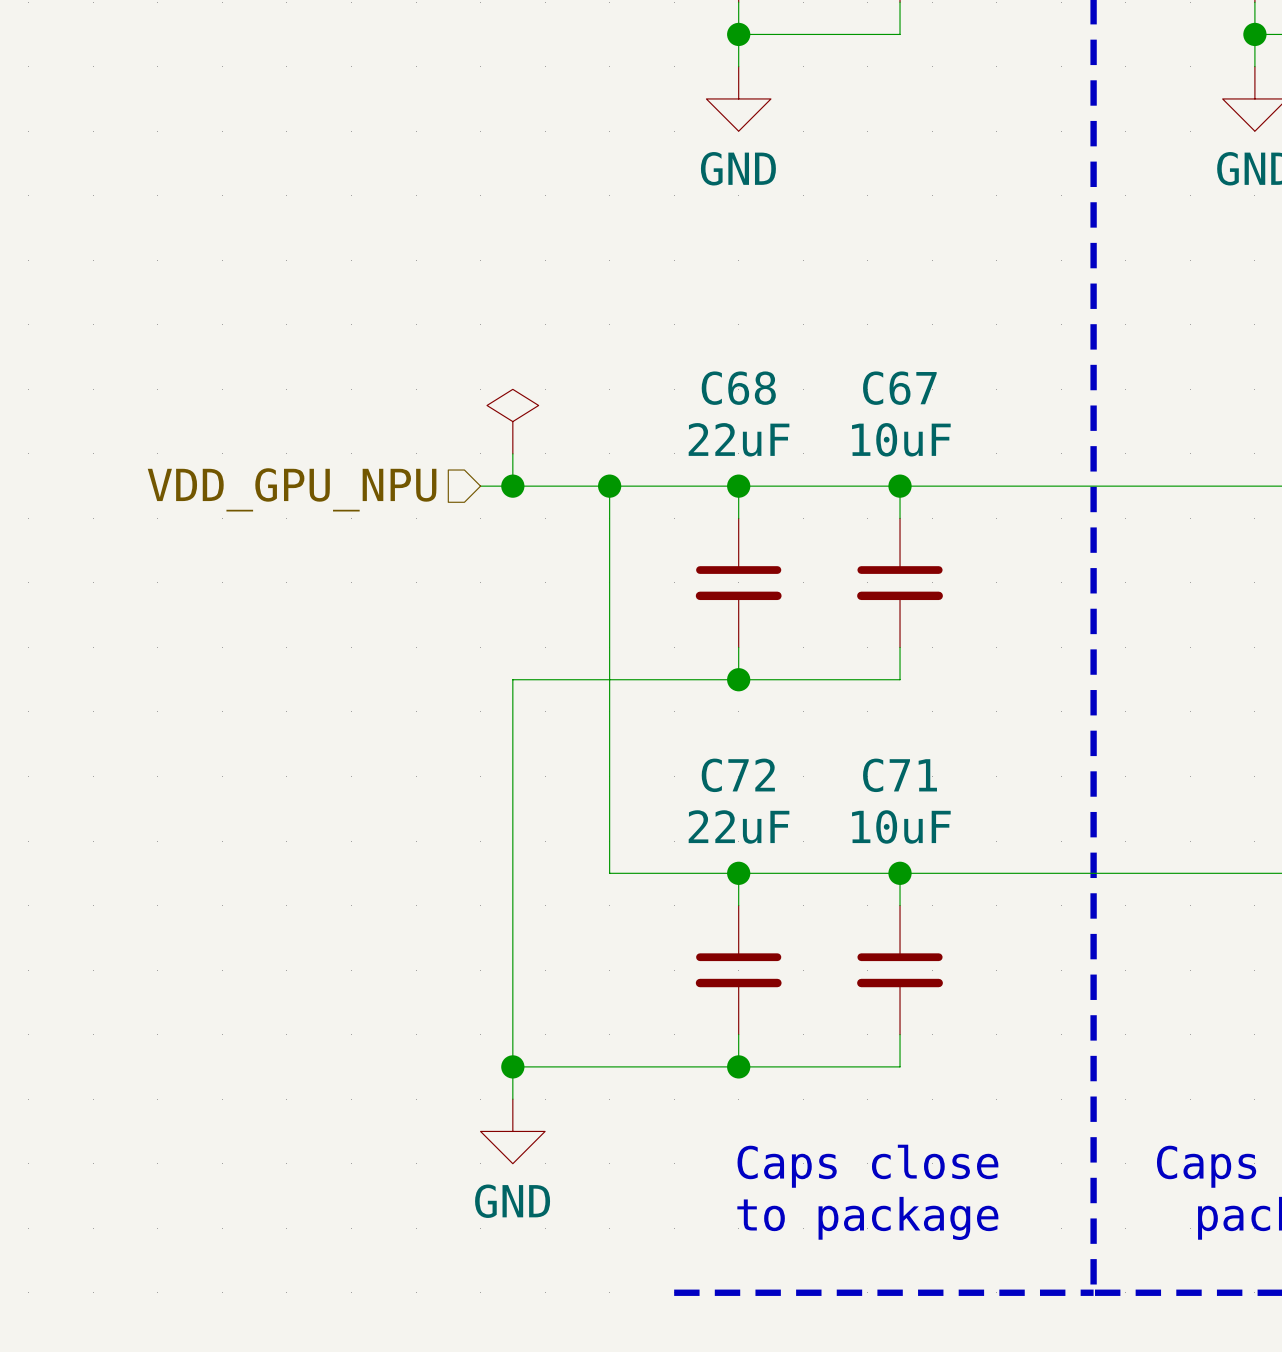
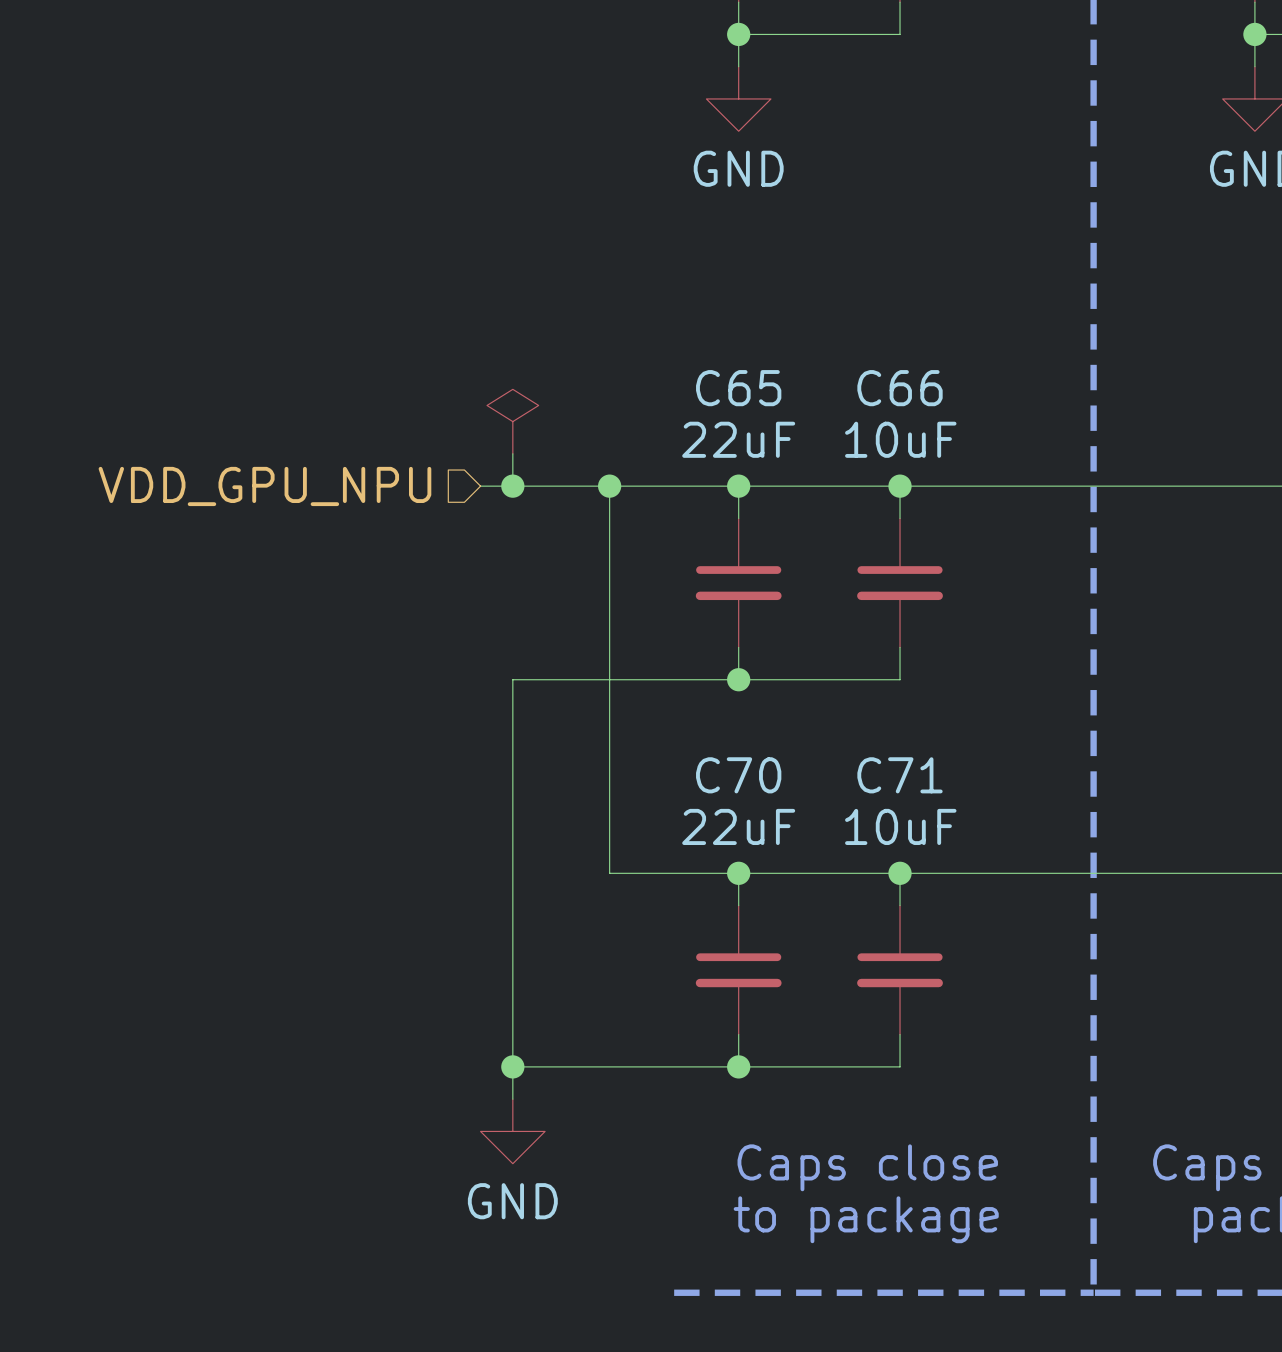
C68 name: C68 (738, 388) -> C65 (738, 388)
C67 name: C67 (899, 388) -> C66 (900, 388)
C72 name: C72 (738, 775) -> C70 (738, 775)

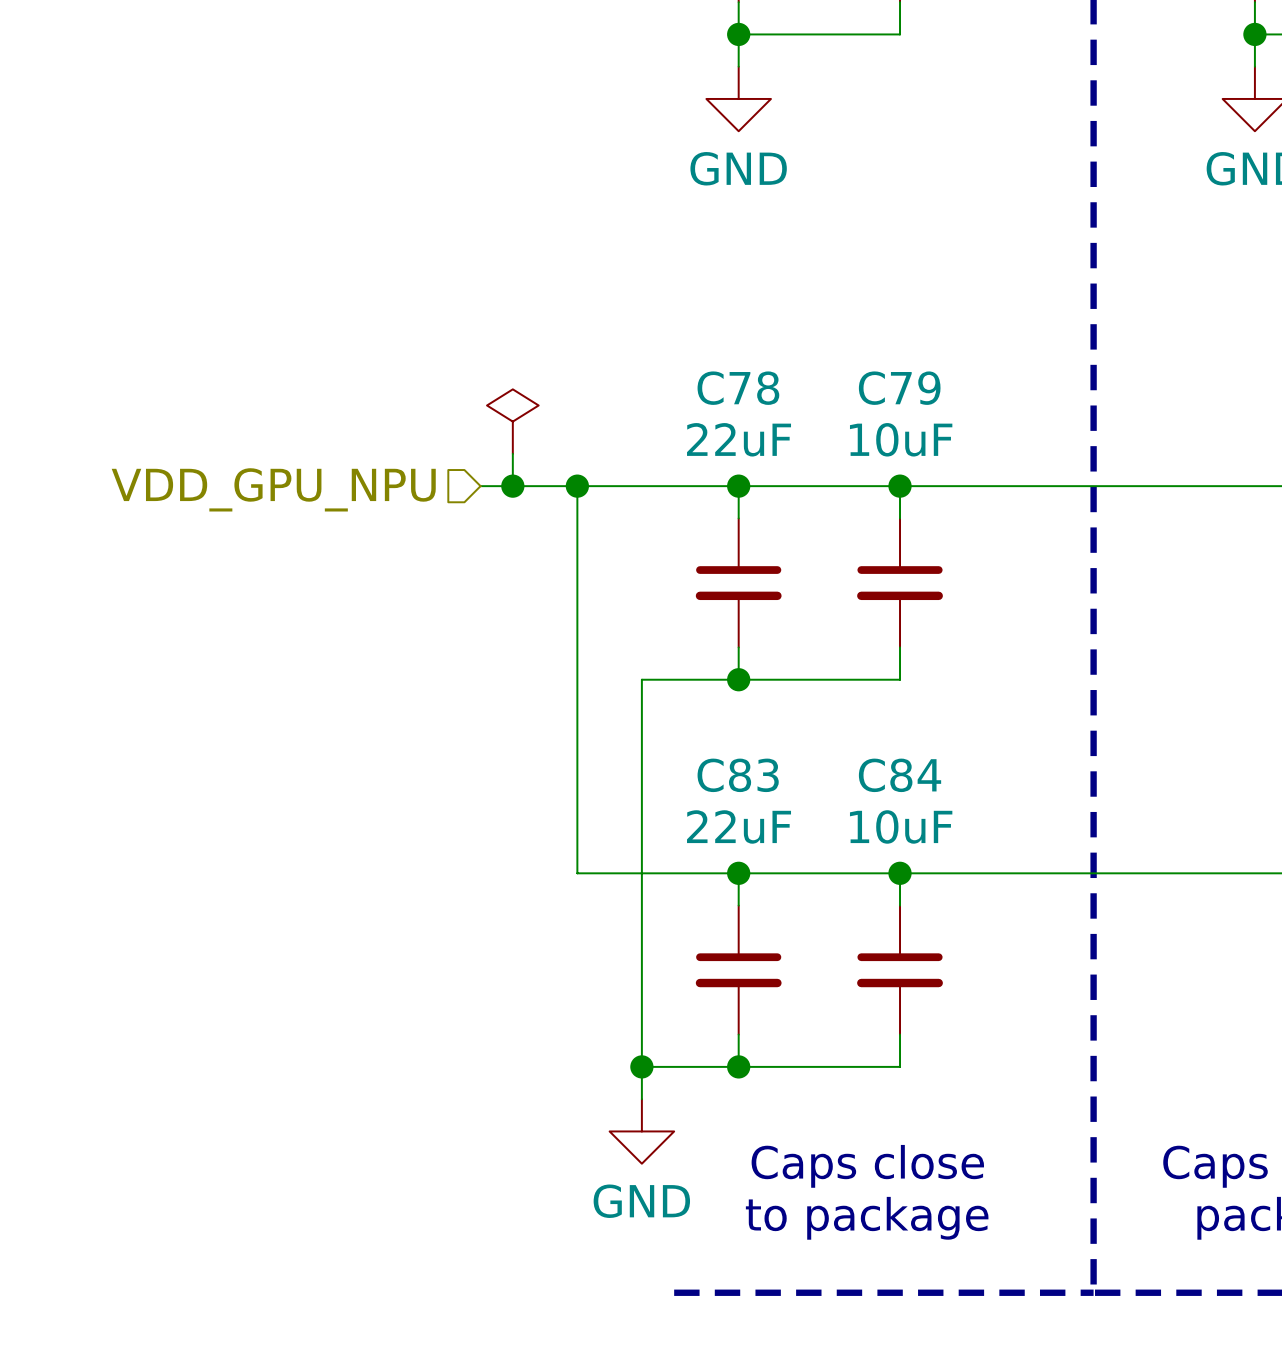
C65 name: C65 (738, 388) -> C78 (738, 388)
C66 name: C66 (900, 388) -> C79 (899, 388)
wire: (609, 486) (609, 873) -> (577, 486) (577, 873) (609, 873)
junction position: (609, 486) -> (577, 486)
wire: (641, 679) (512, 679) (512, 1099) -> (641, 679) (641, 1099)
C70 name: C70 (738, 775) -> C83 (738, 775)
C71 name: C71 (900, 775) -> C84 (900, 775)
wire: (512, 1066) (641, 1066) -> none
junction position: (512, 1066) -> (641, 1066)
power symbol position: GND (512, 1131) -> GND (641, 1131)

